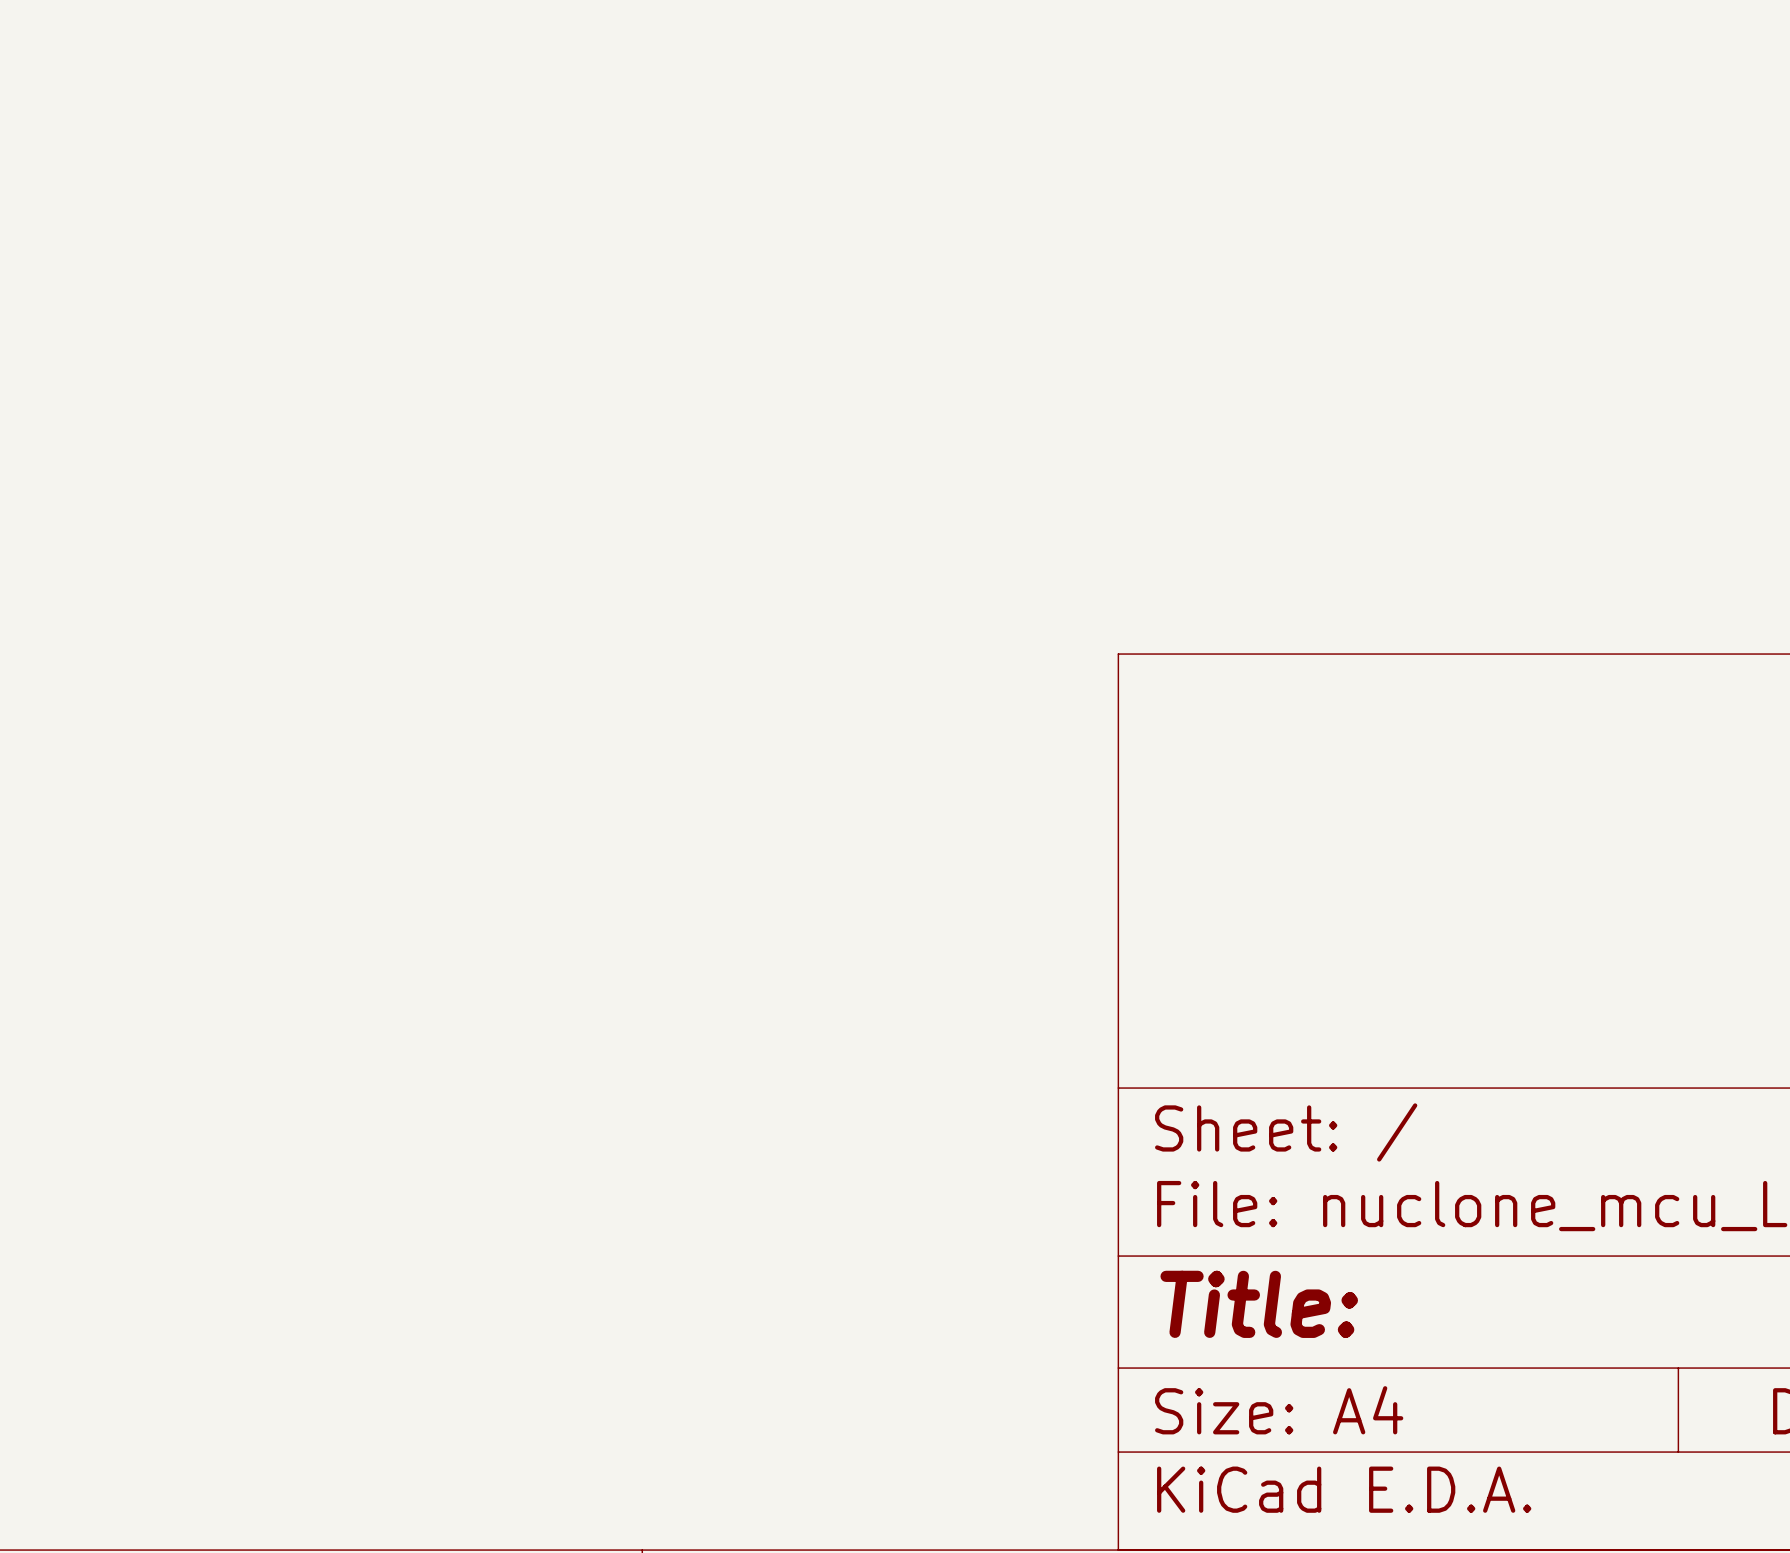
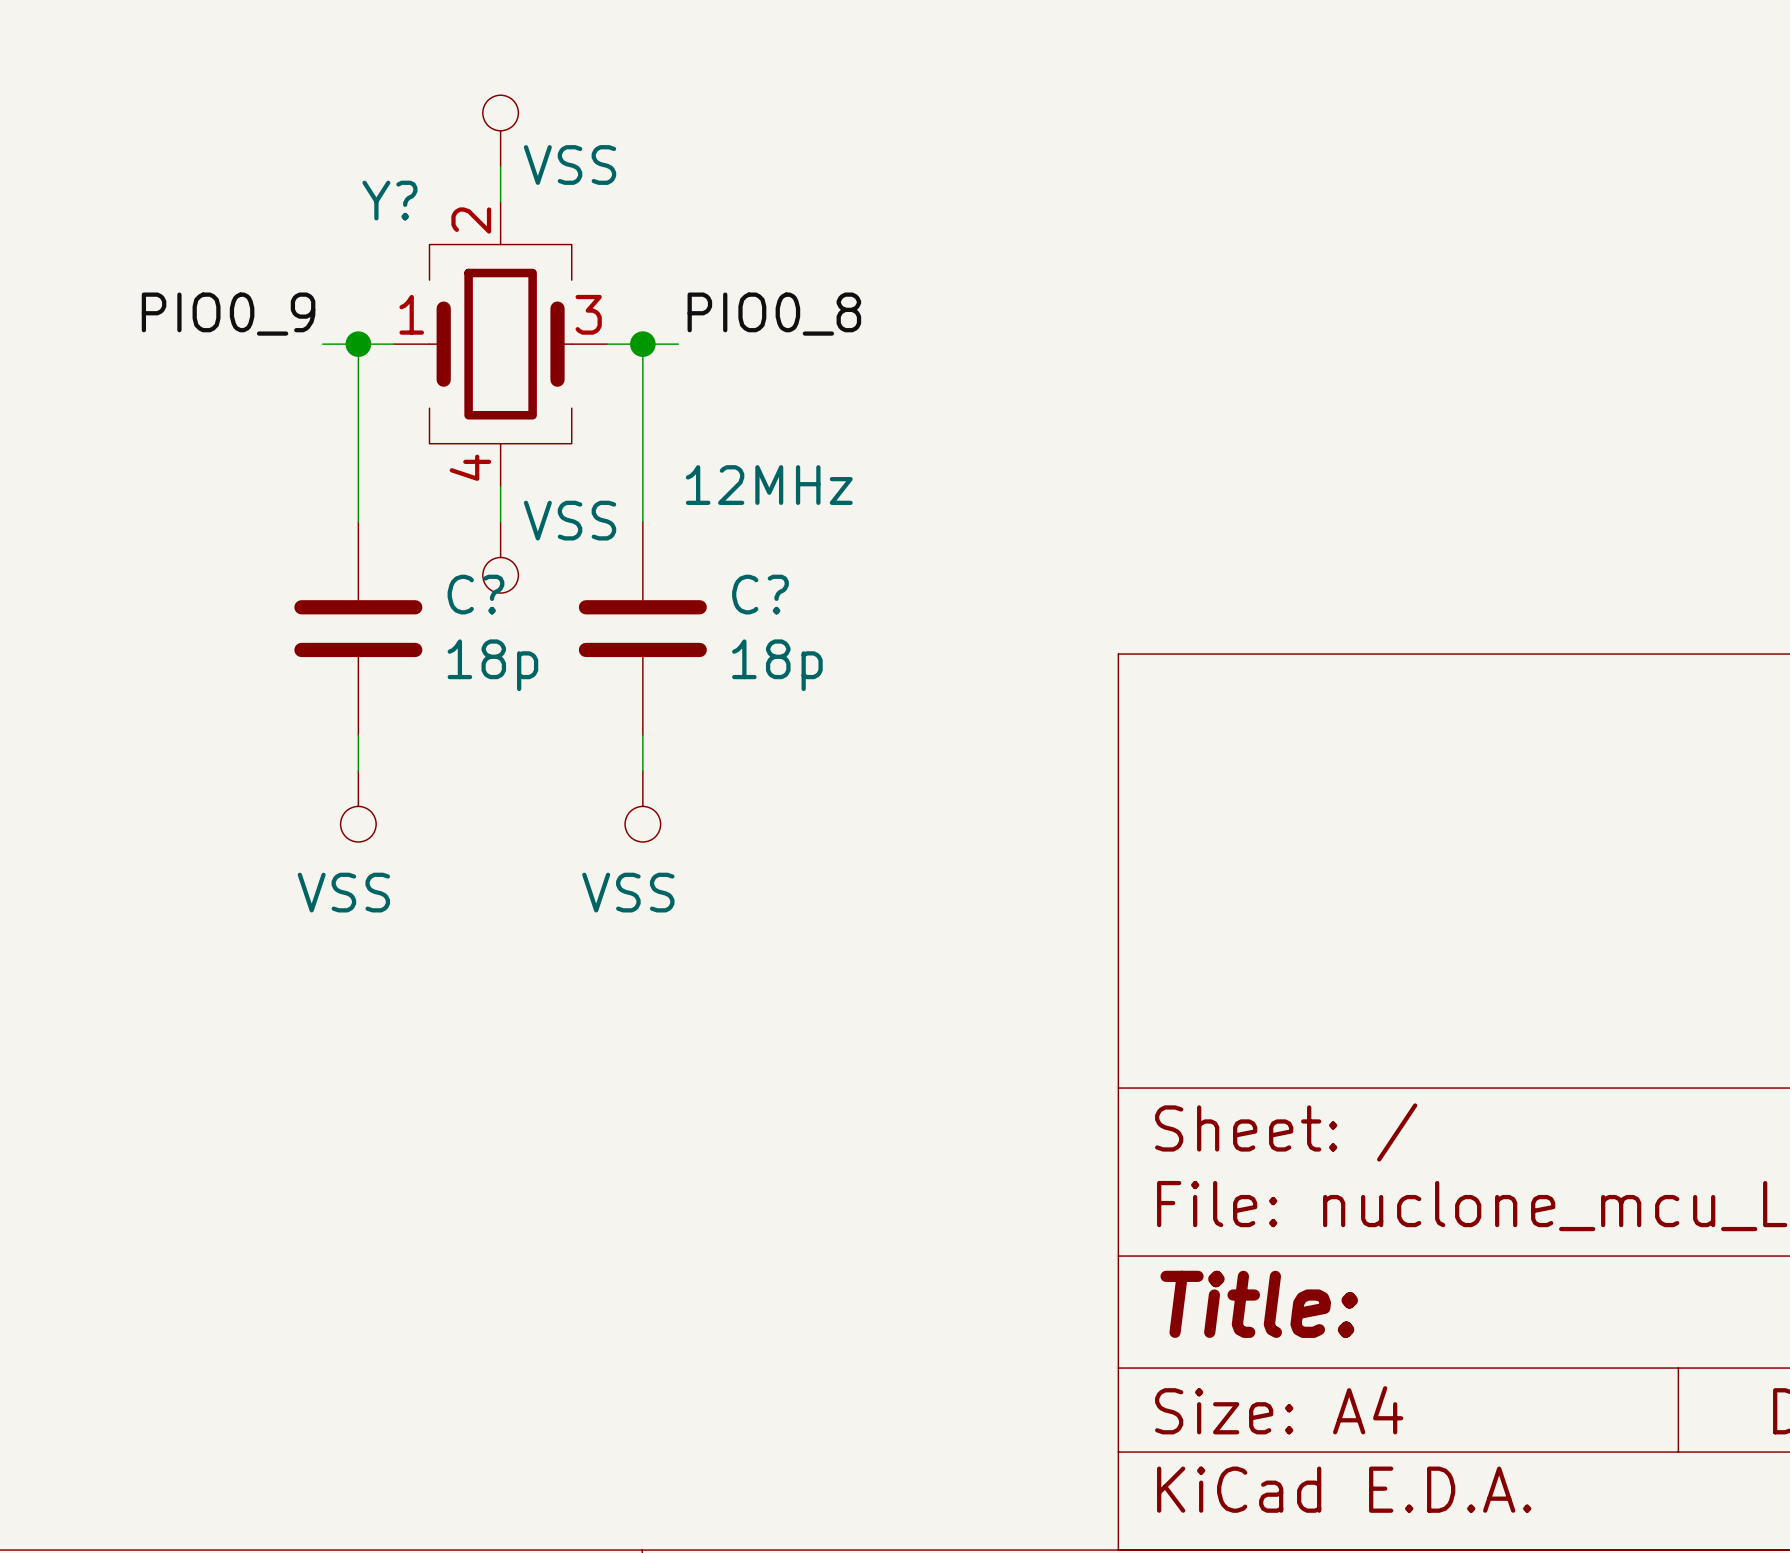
power symbol: none -> VSS (500, 130)
wire: none -> (500, 166) (500, 201)
label: none -> PIO0_9 (228, 314)
label: none -> PIO0_8 (774, 314)
wire: none -> (322, 344) (393, 344)
wire: none -> (358, 344) (358, 521)
junction: none -> (358, 344)
Y?: none -> 12MHz (500, 344)
wire: none -> (607, 344) (678, 344)
wire: none -> (642, 344) (642, 521)
junction: none -> (642, 344)
wire: none -> (500, 486) (500, 521)
power symbol: none -> VSS (500, 557)
C?: none -> 18p (358, 628)
C?: none -> 18p (642, 628)
wire: none -> (358, 735) (358, 770)
wire: none -> (642, 735) (642, 770)
power symbol: none -> VSS (358, 806)
power symbol: none -> VSS (642, 806)

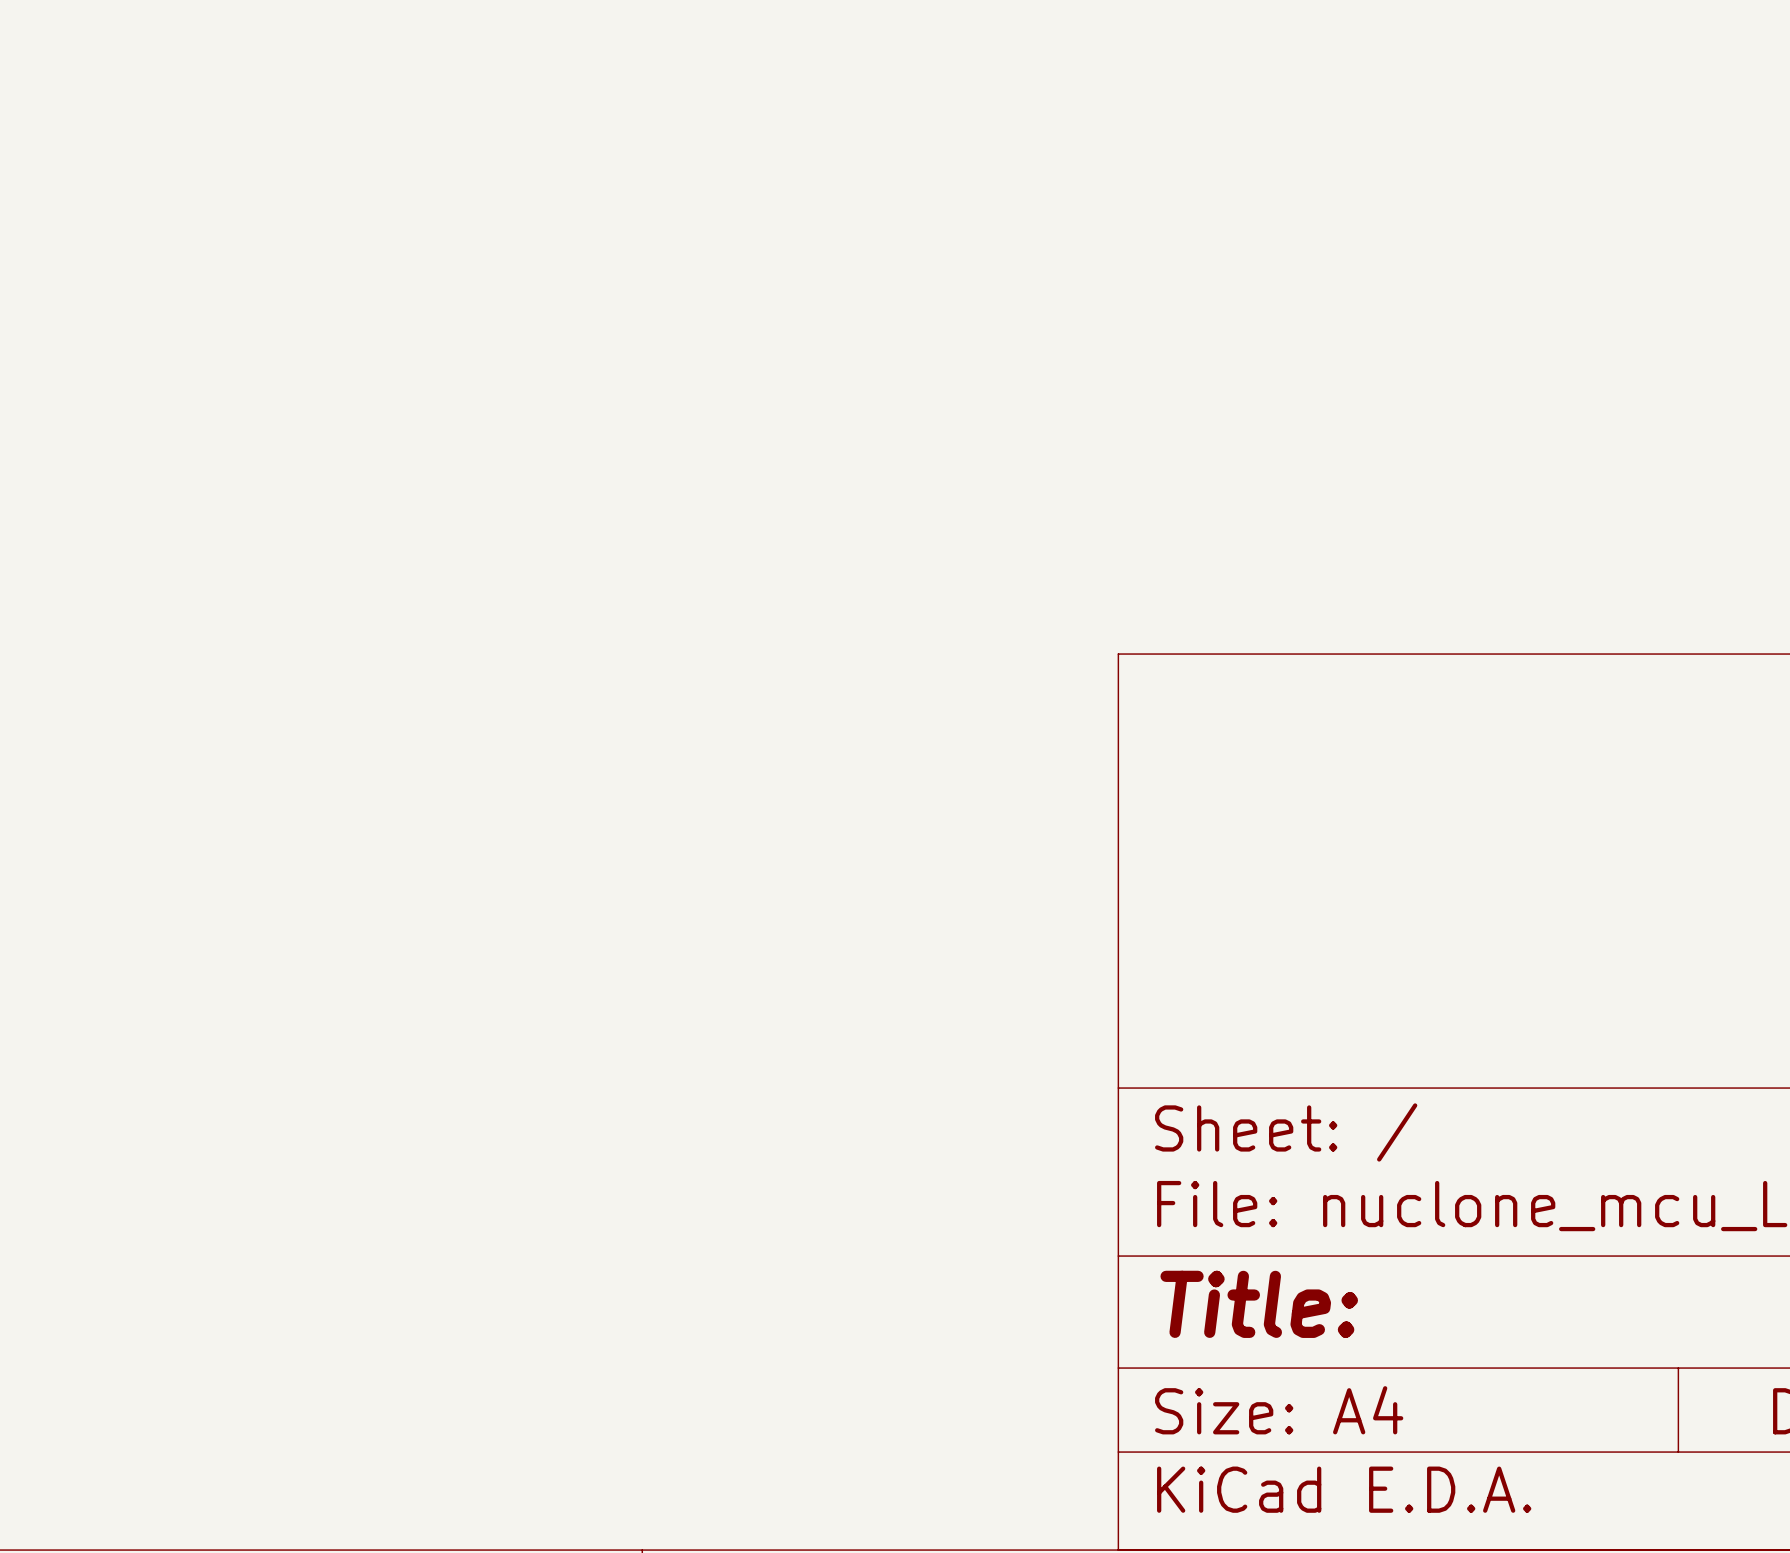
power symbol: VSS (500, 130) -> none
wire: (500, 166) (500, 201) -> none
label: PIO0_9 (228, 314) -> none
label: PIO0_8 (774, 314) -> none
wire: (322, 344) (393, 344) -> none
wire: (358, 344) (358, 521) -> none
junction: (358, 344) -> none
Y?: 12MHz (500, 344) -> none
wire: (607, 344) (678, 344) -> none
wire: (642, 344) (642, 521) -> none
junction: (642, 344) -> none
wire: (500, 486) (500, 521) -> none
power symbol: VSS (500, 557) -> none
C?: 18p (358, 628) -> none
C?: 18p (642, 628) -> none
wire: (358, 735) (358, 770) -> none
wire: (642, 735) (642, 770) -> none
power symbol: VSS (358, 806) -> none
power symbol: VSS (642, 806) -> none

